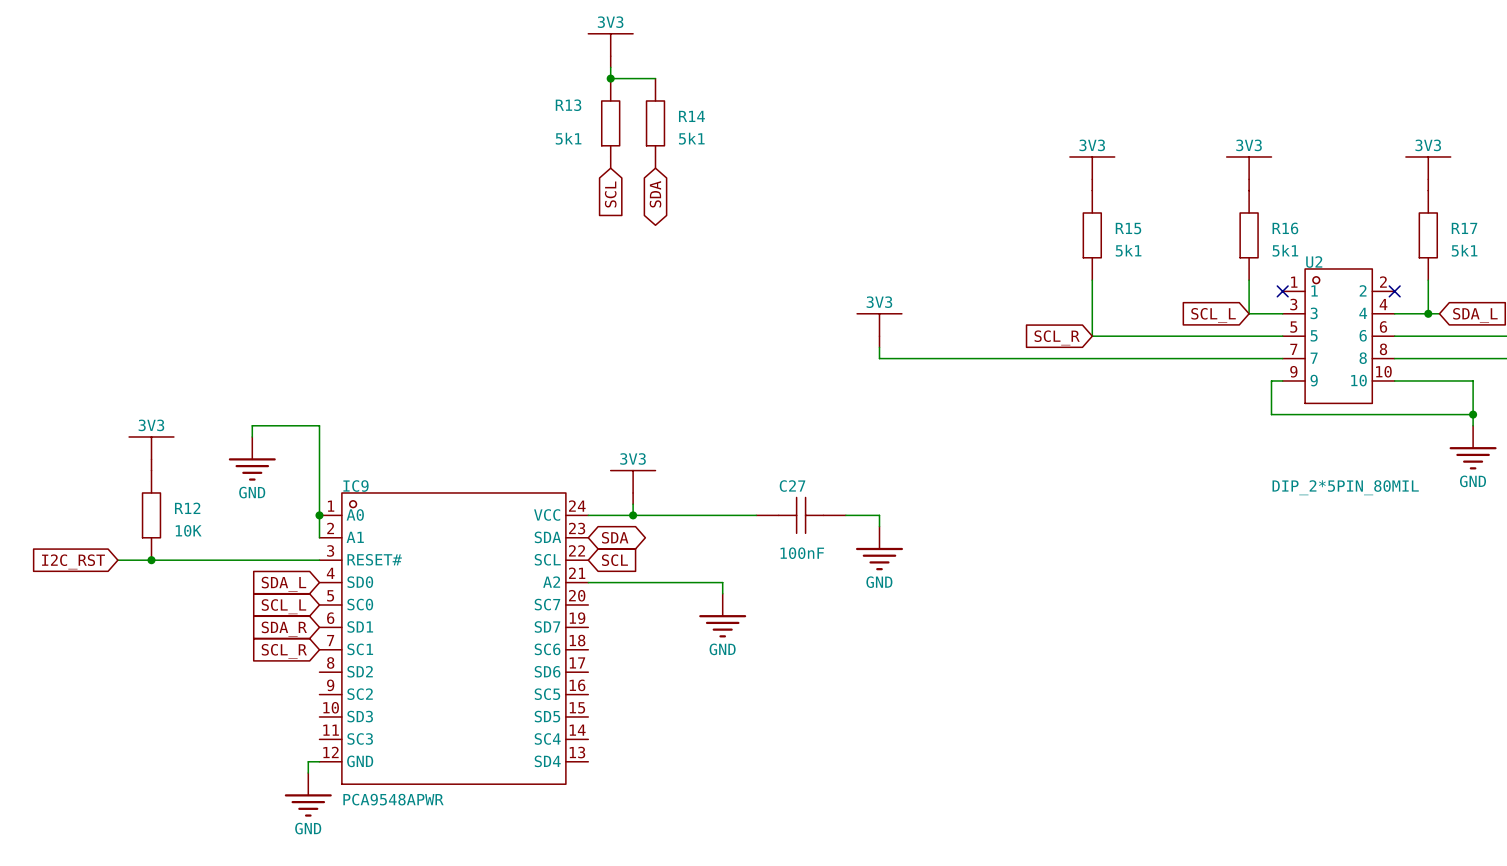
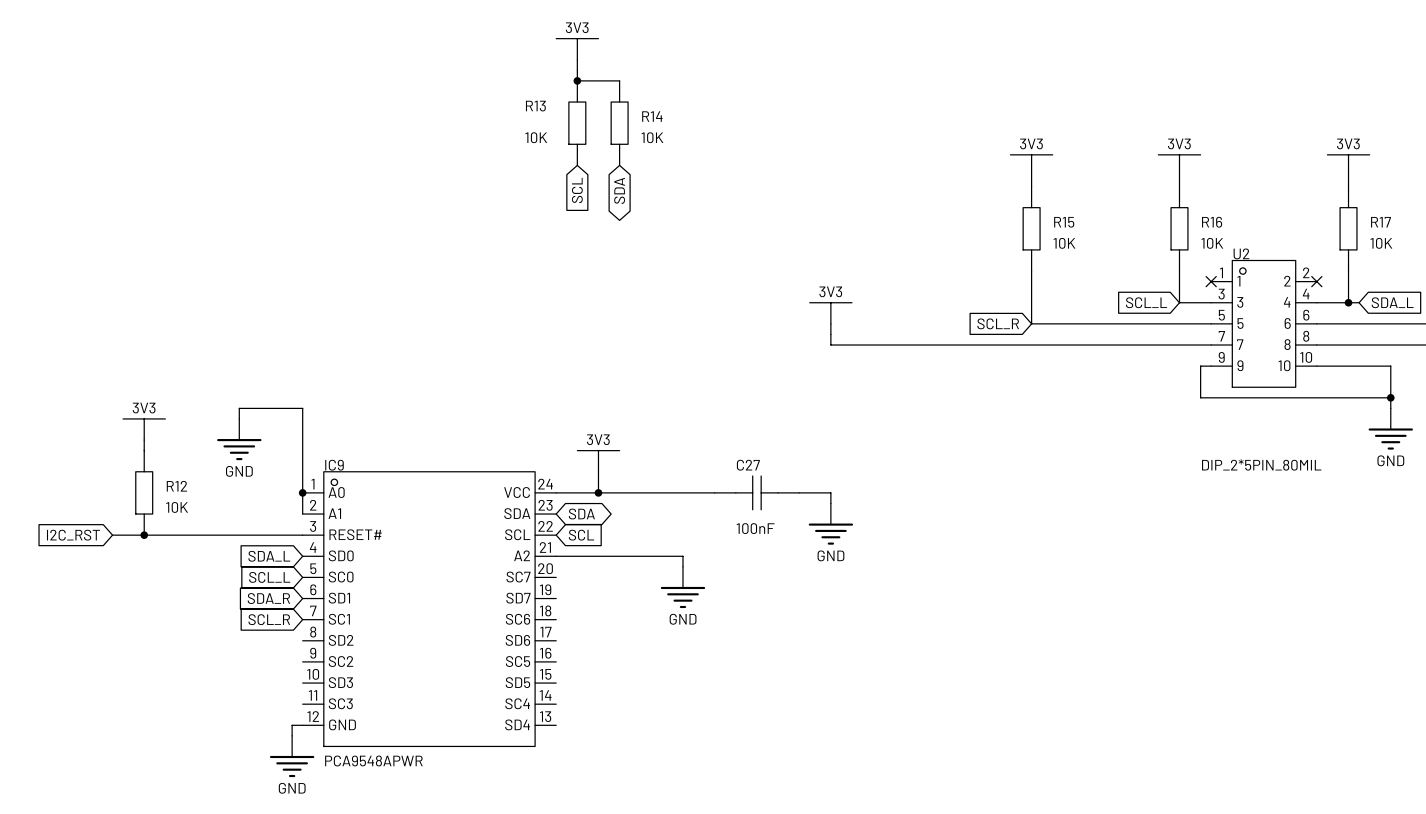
R13 value: 5k1 (568, 138) -> 10K (536, 137)
R14 value: 5k1 (691, 138) -> 10K (652, 137)
R15 value: 5k1 (1128, 250) -> 10K (1064, 243)
R16 value: 5k1 (1285, 250) -> 10K (1212, 243)
R17 value: 5k1 (1464, 250) -> 10K (1381, 243)

